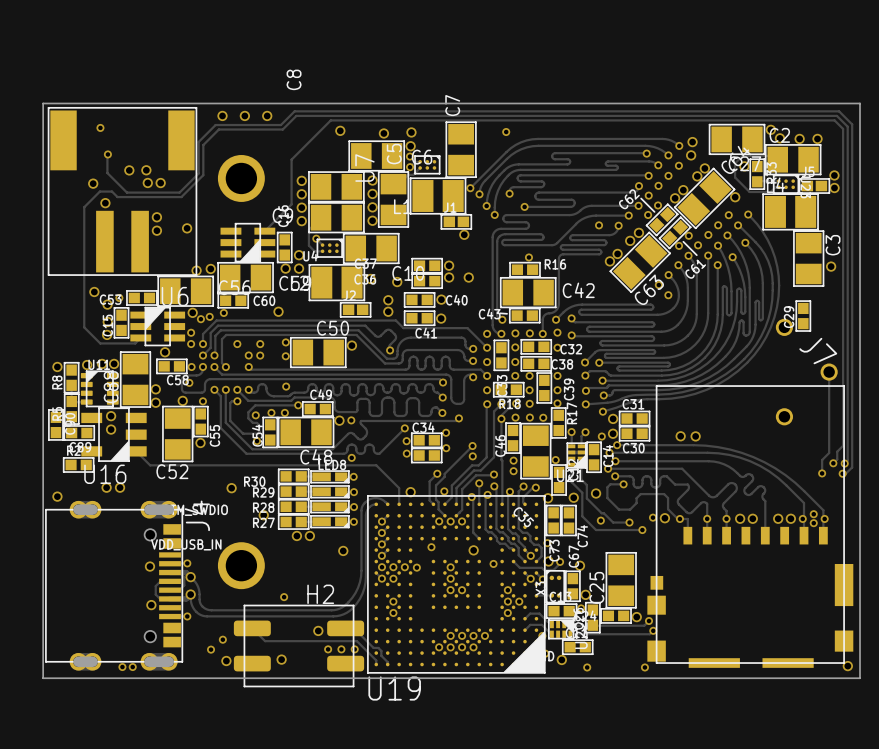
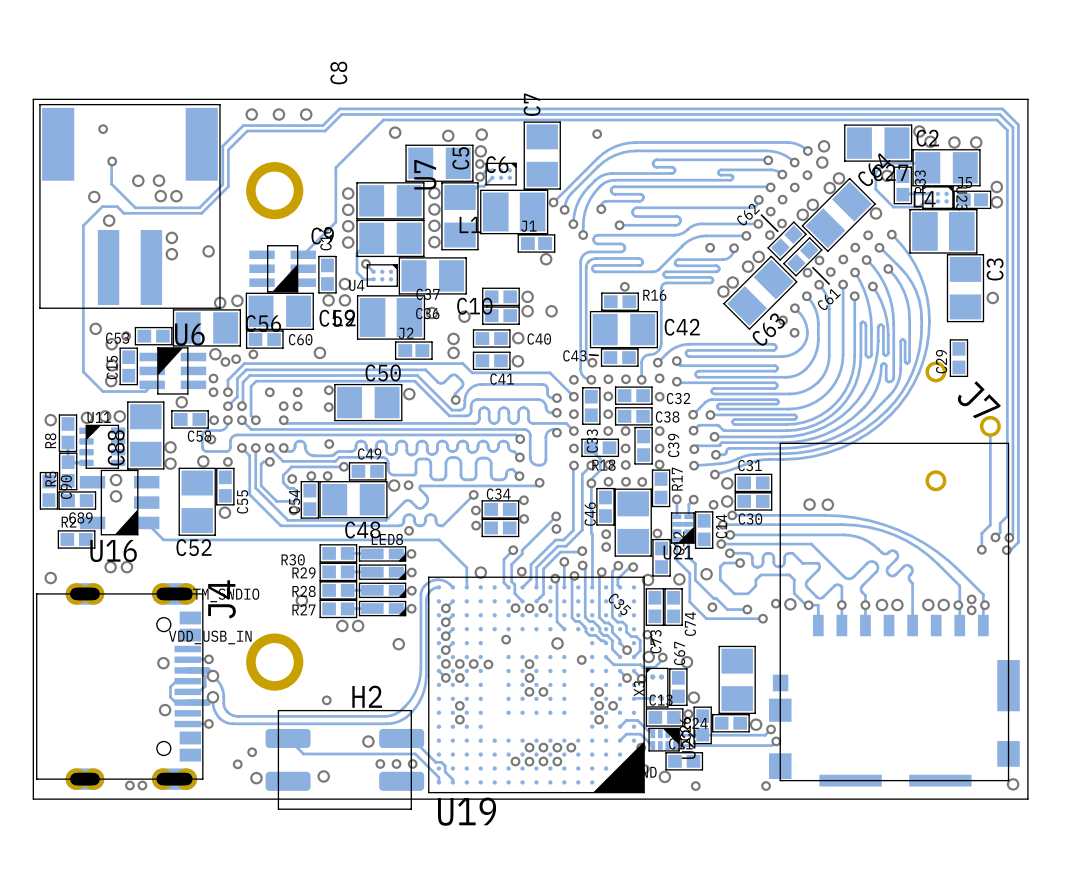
via: (231, 488) -> none
C25 name: C25 (596, 587) -> none

